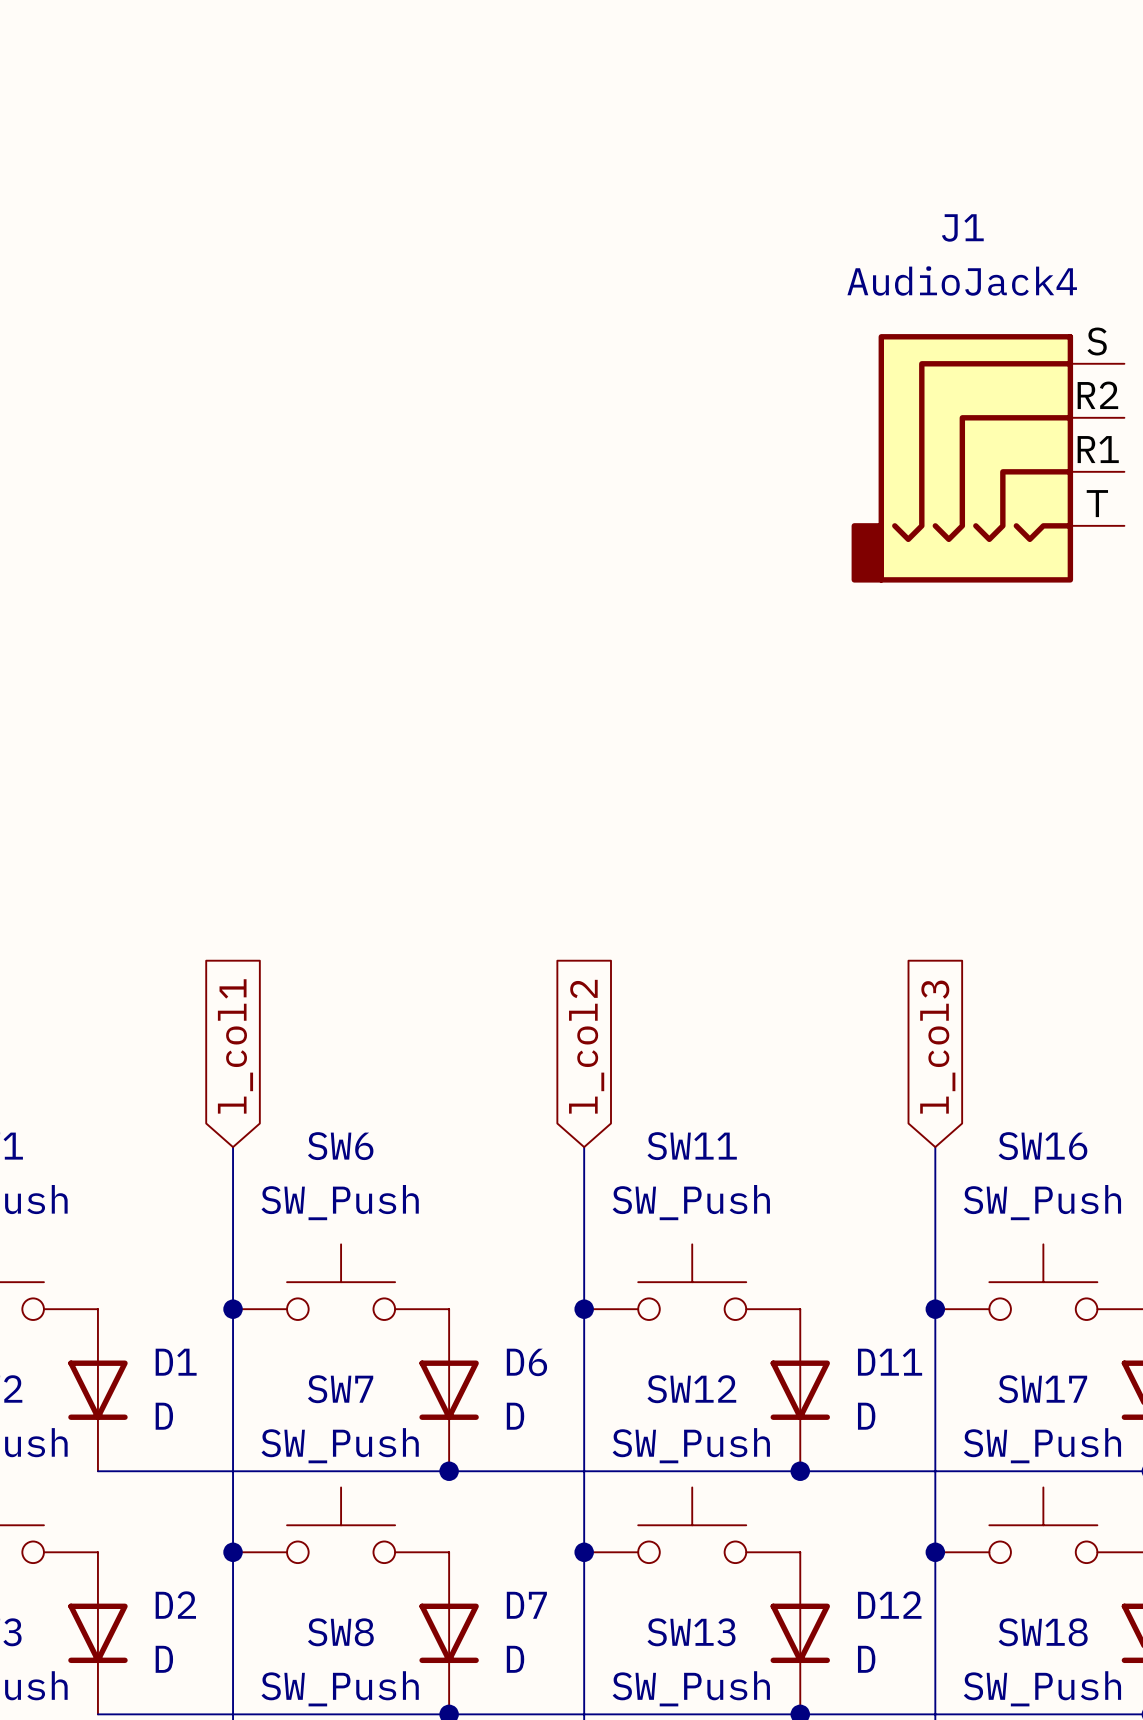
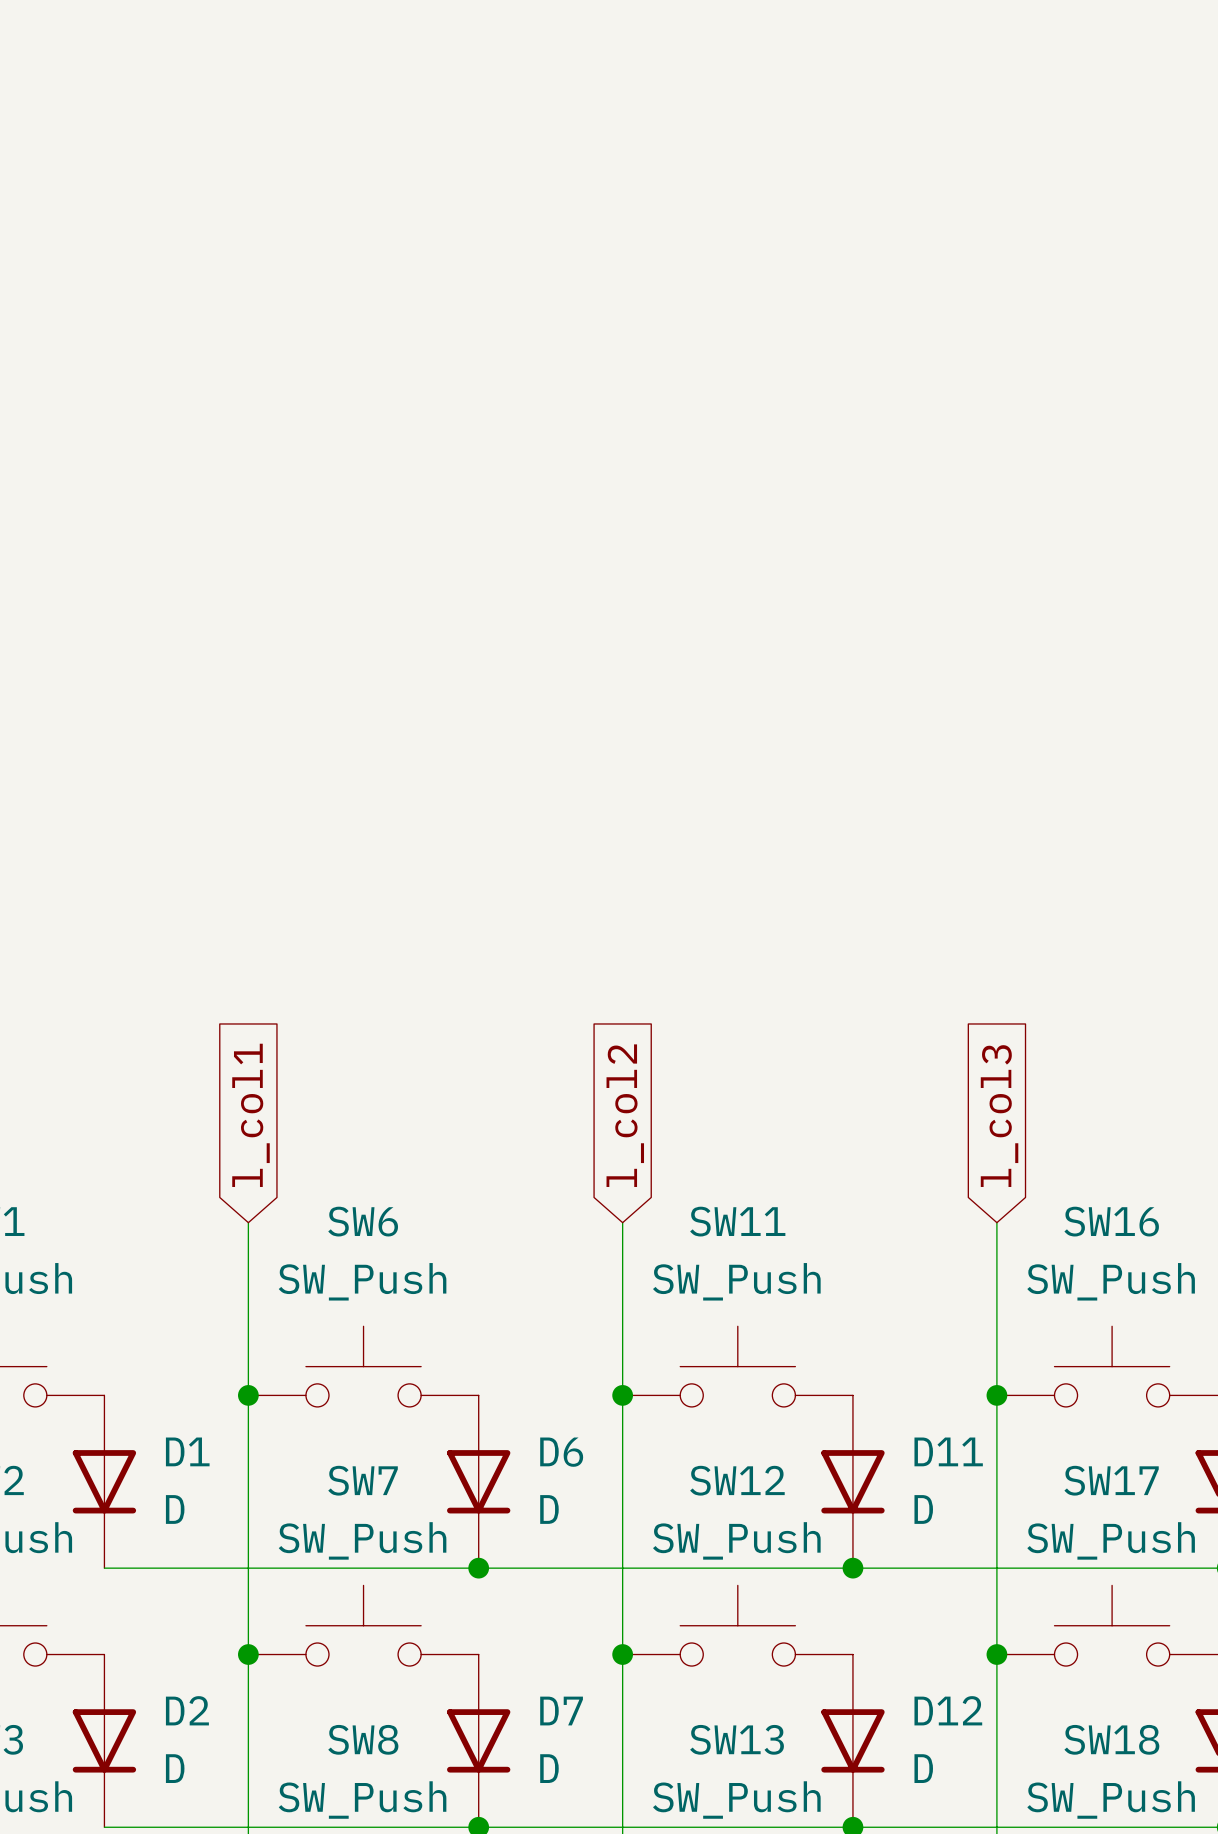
J1: AudioJack4 (987, 458) -> none

